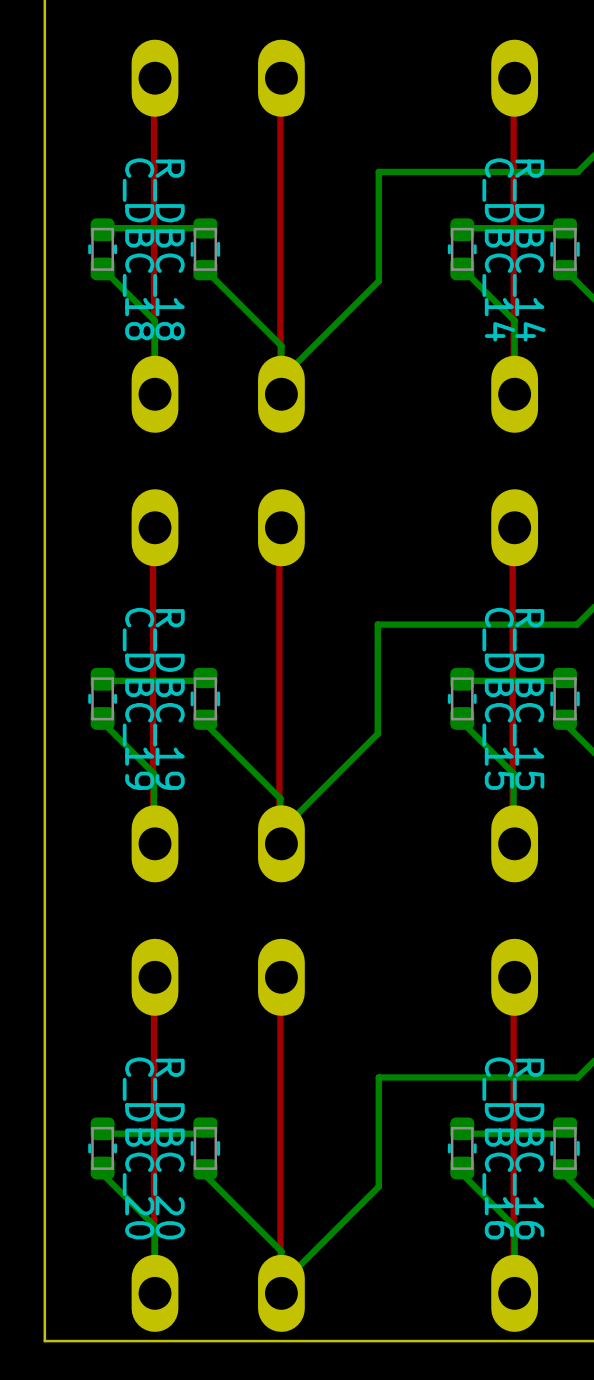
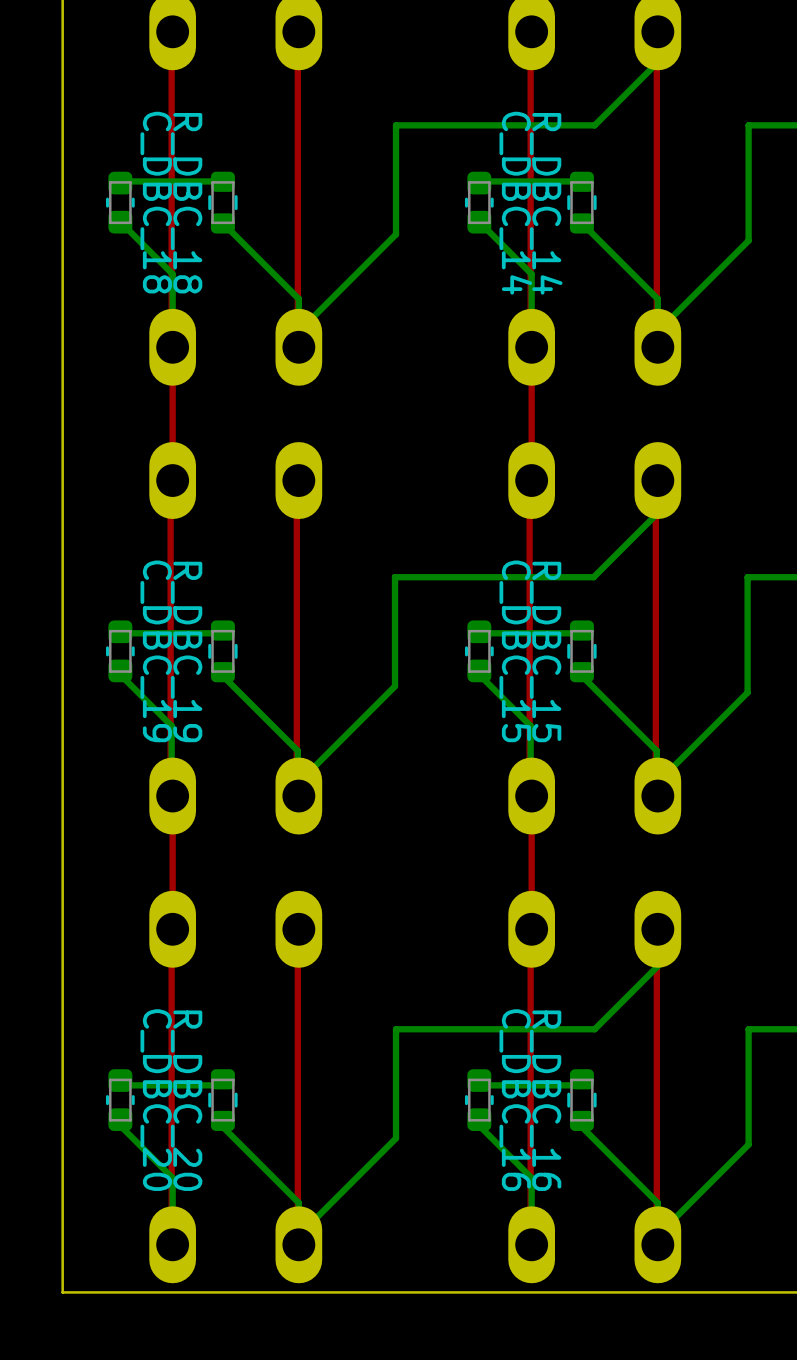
top track: none -> (172, 347) (172, 480)
top track: none -> (531, 347) (531, 480)
top track: none -> (172, 796) (172, 929)
top track: none -> (531, 796) (531, 929)

